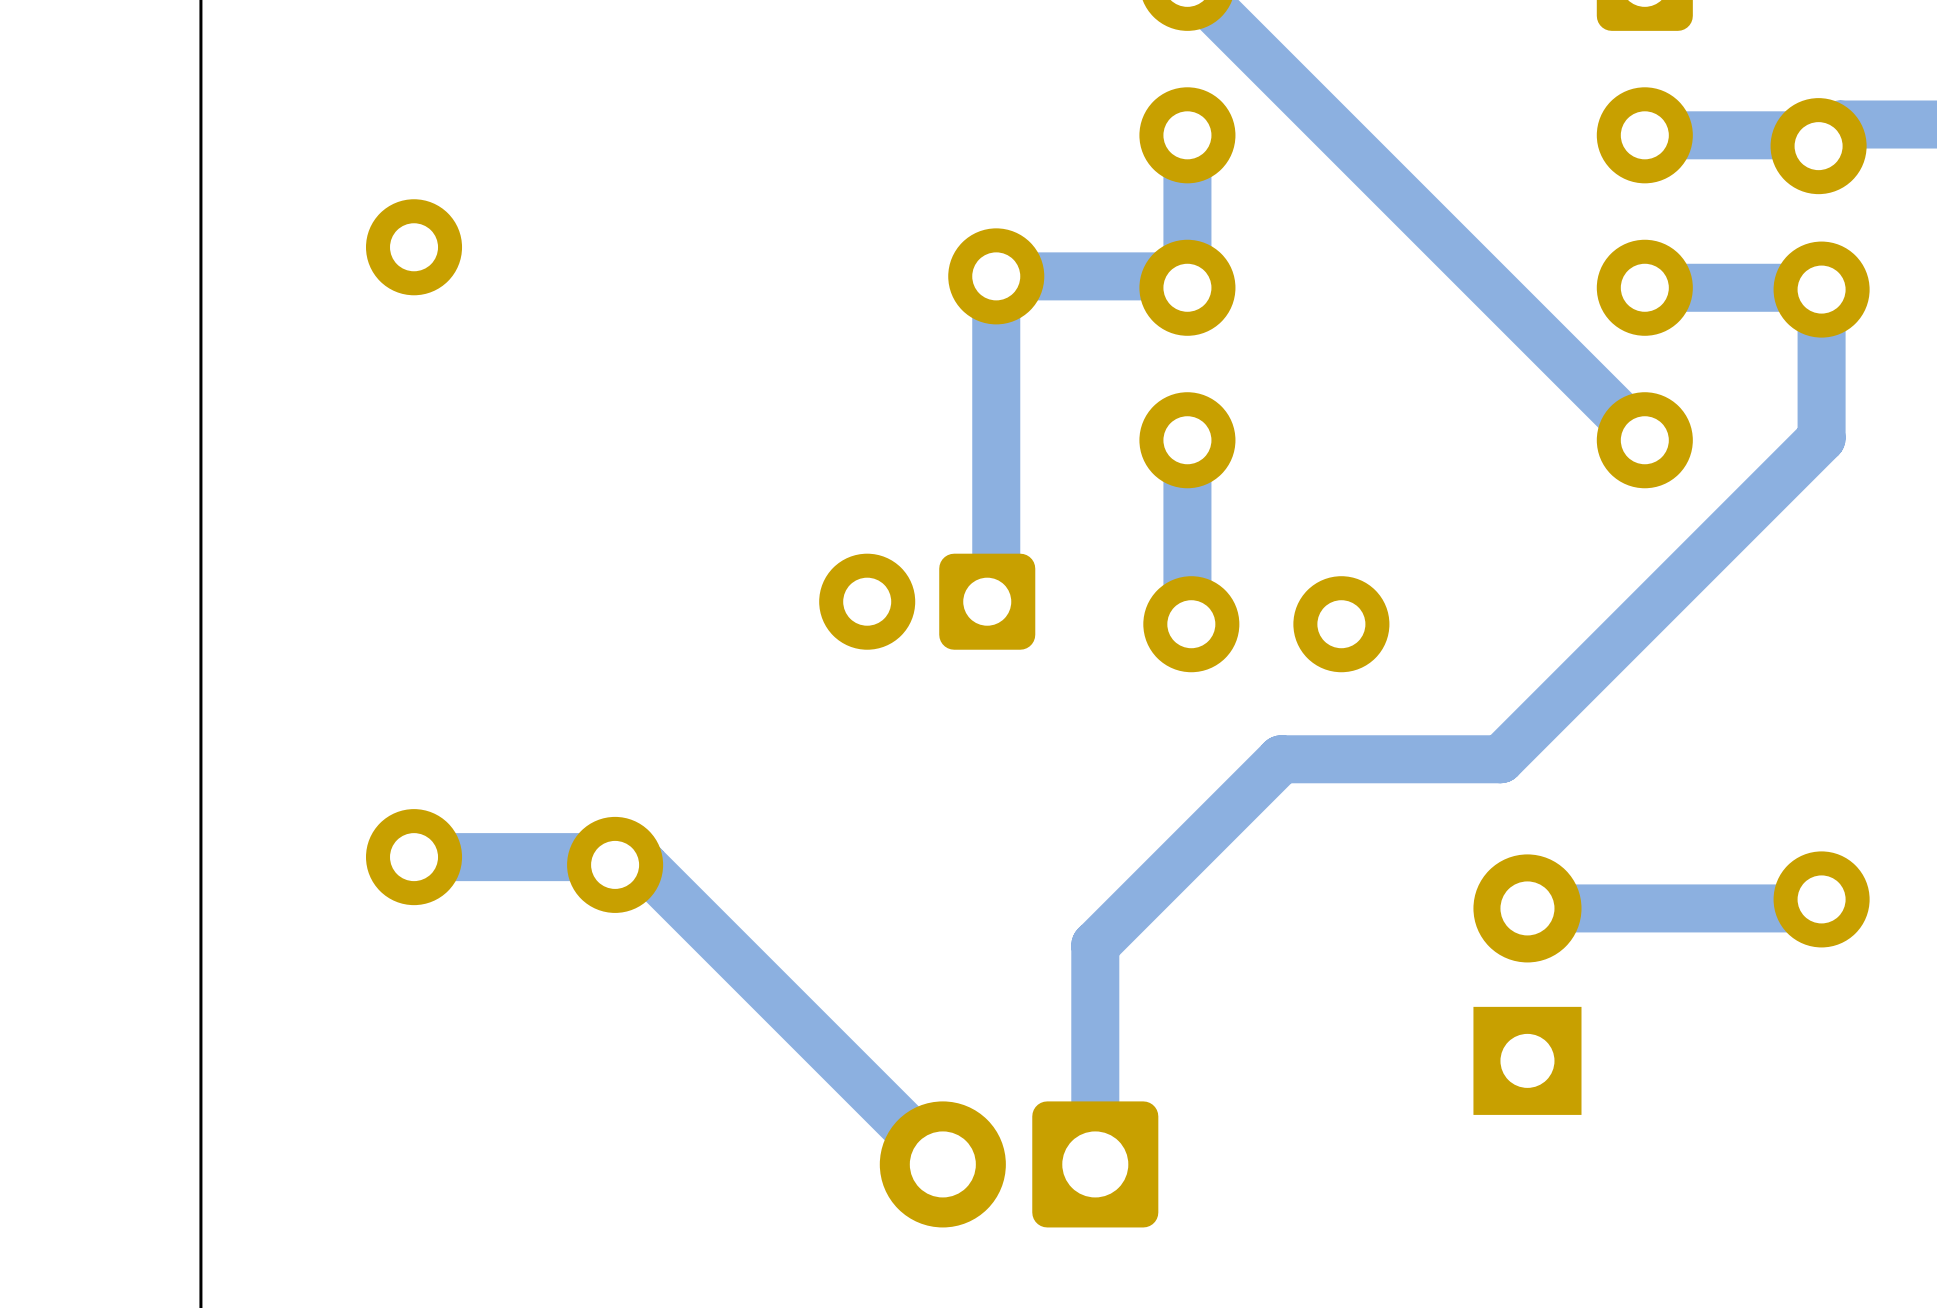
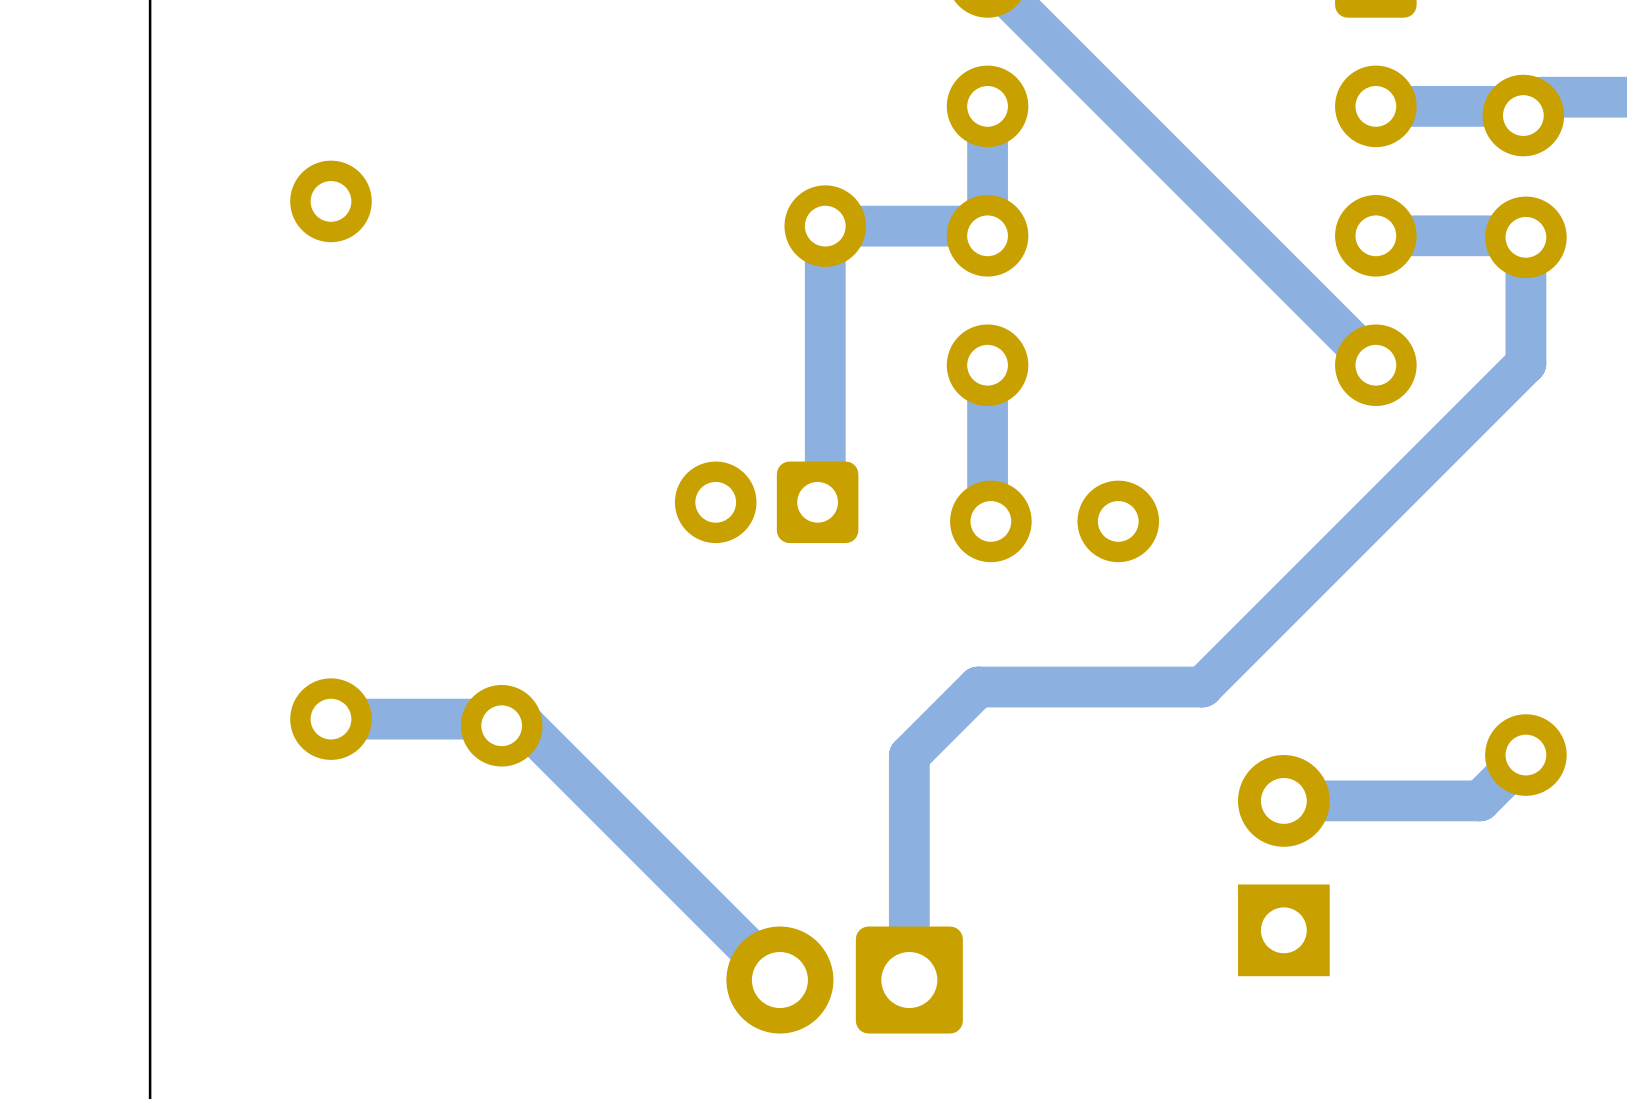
track: (1500, 759) (1281, 759) (1095, 945) -> (1253, 636) (1202, 687) (978, 687) (909, 755) (909, 794)
track: (1812, 908) (1527, 908) -> (1518, 762) (1480, 800) (1283, 800)
part position: (1527, 984) -> (1283, 865)

